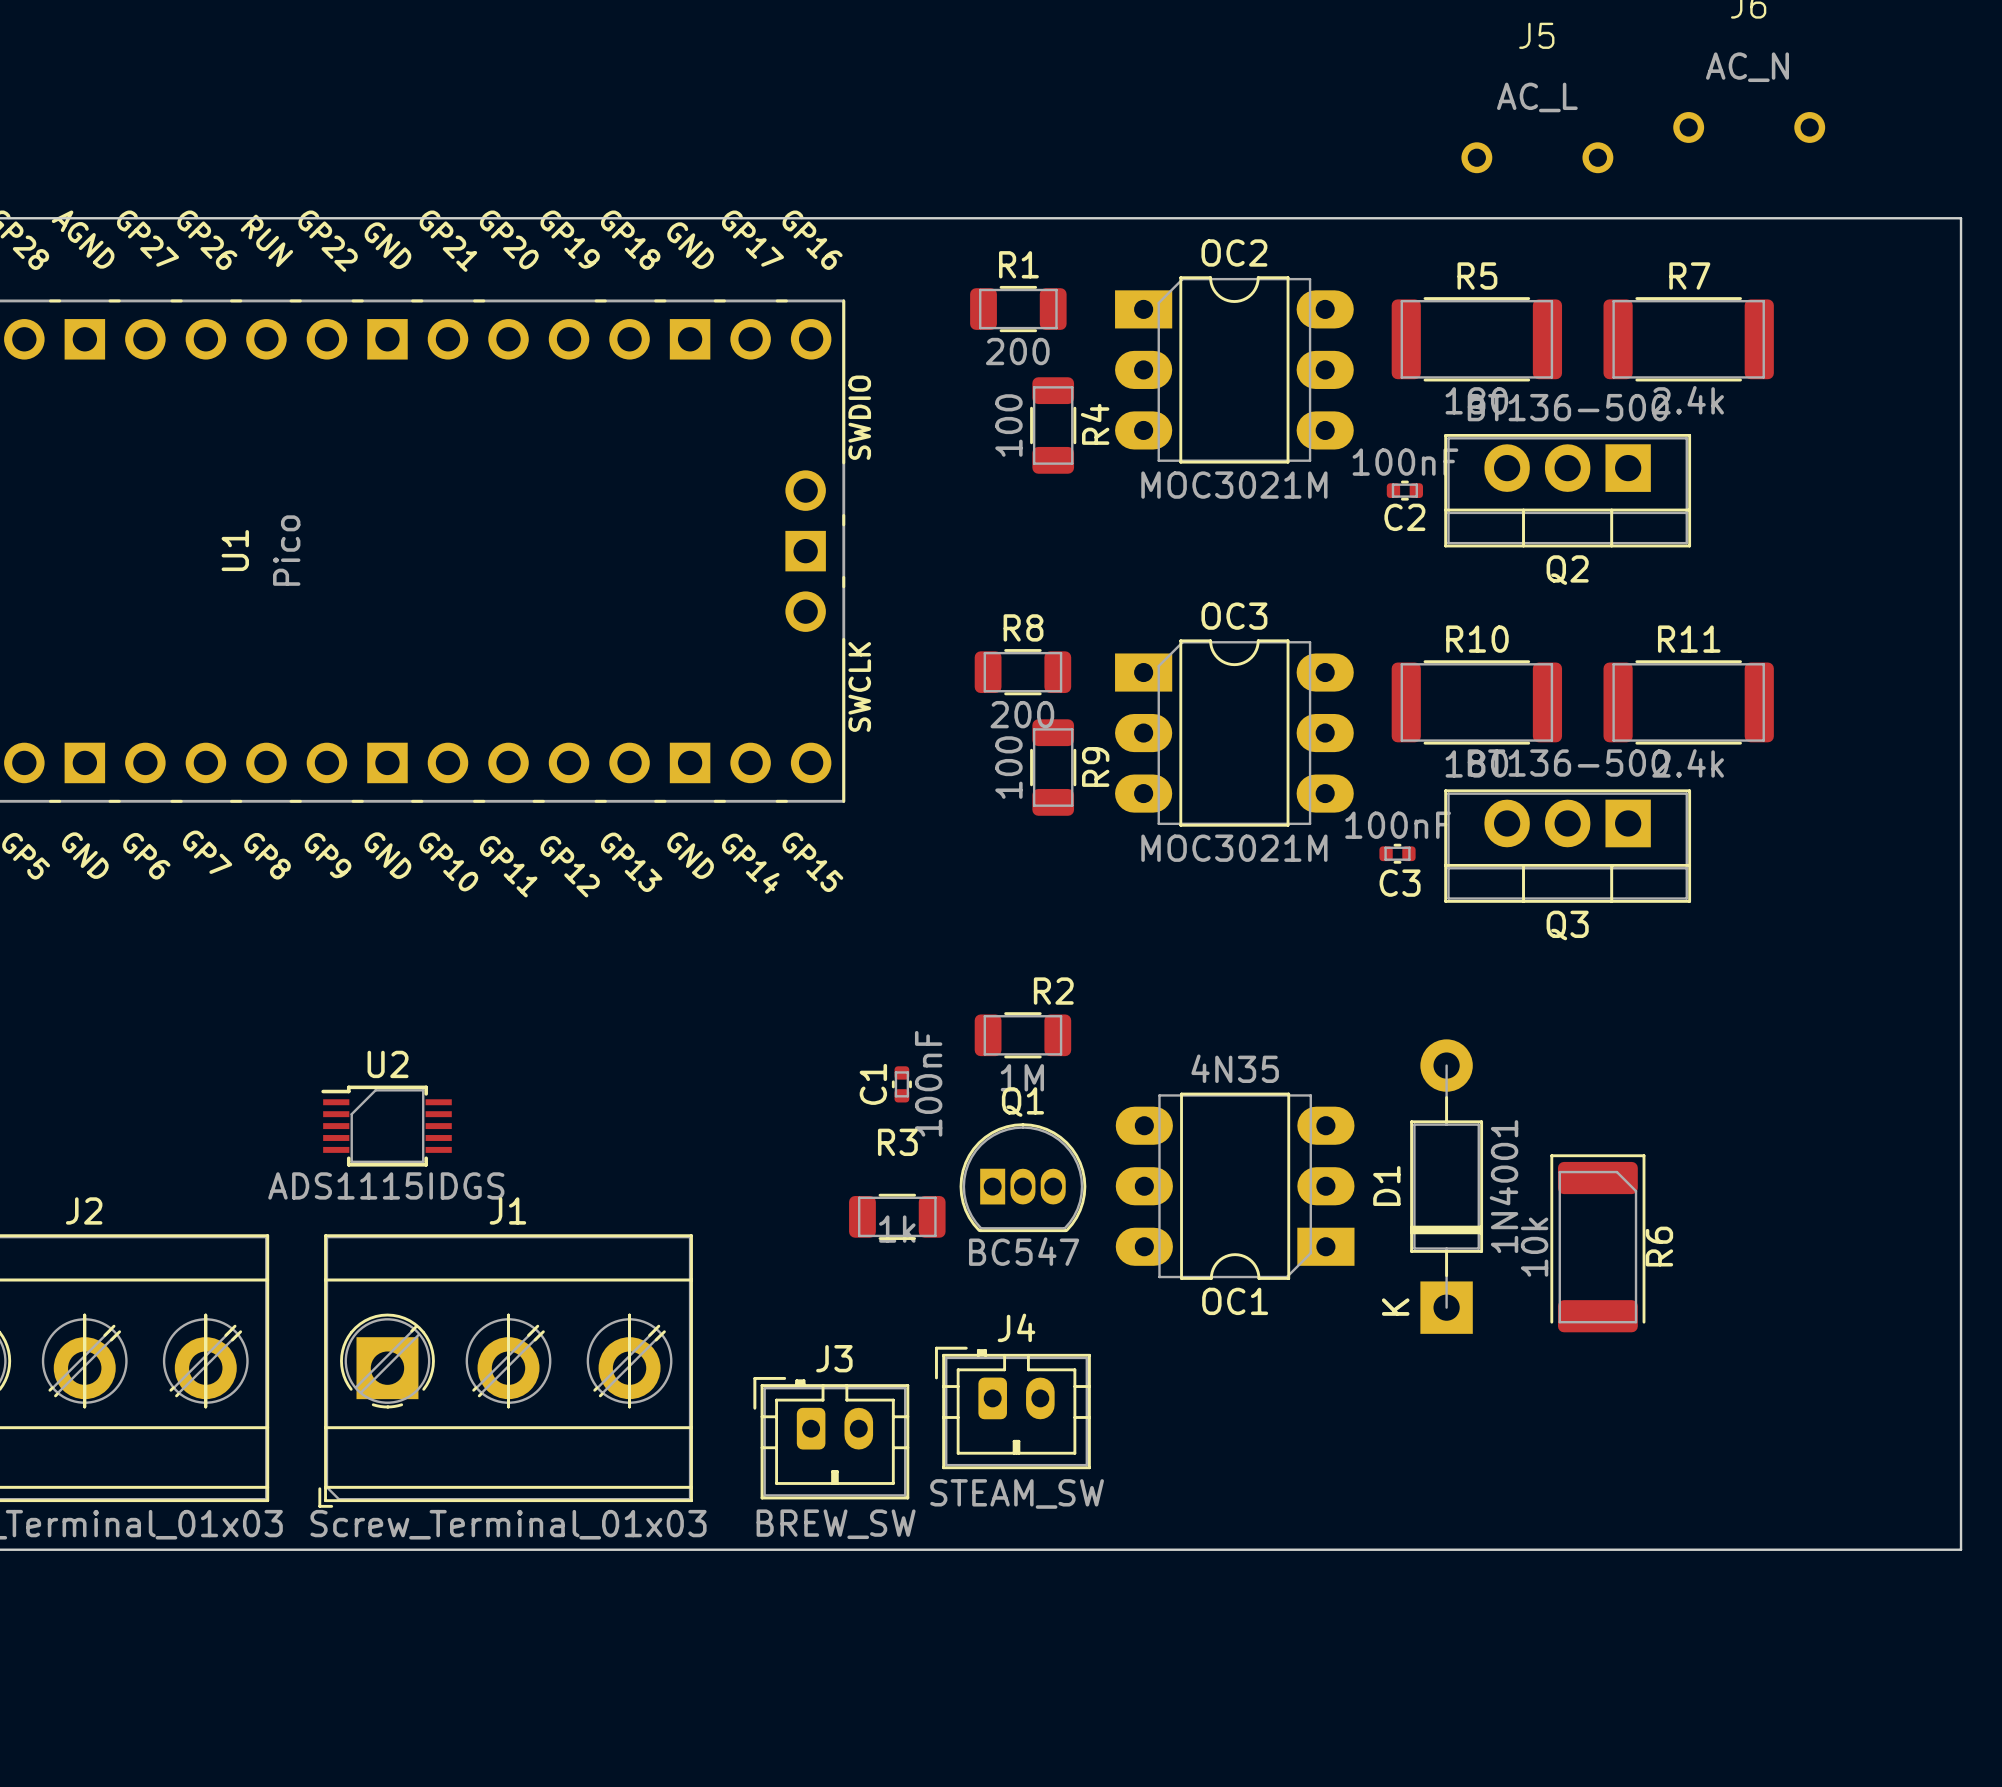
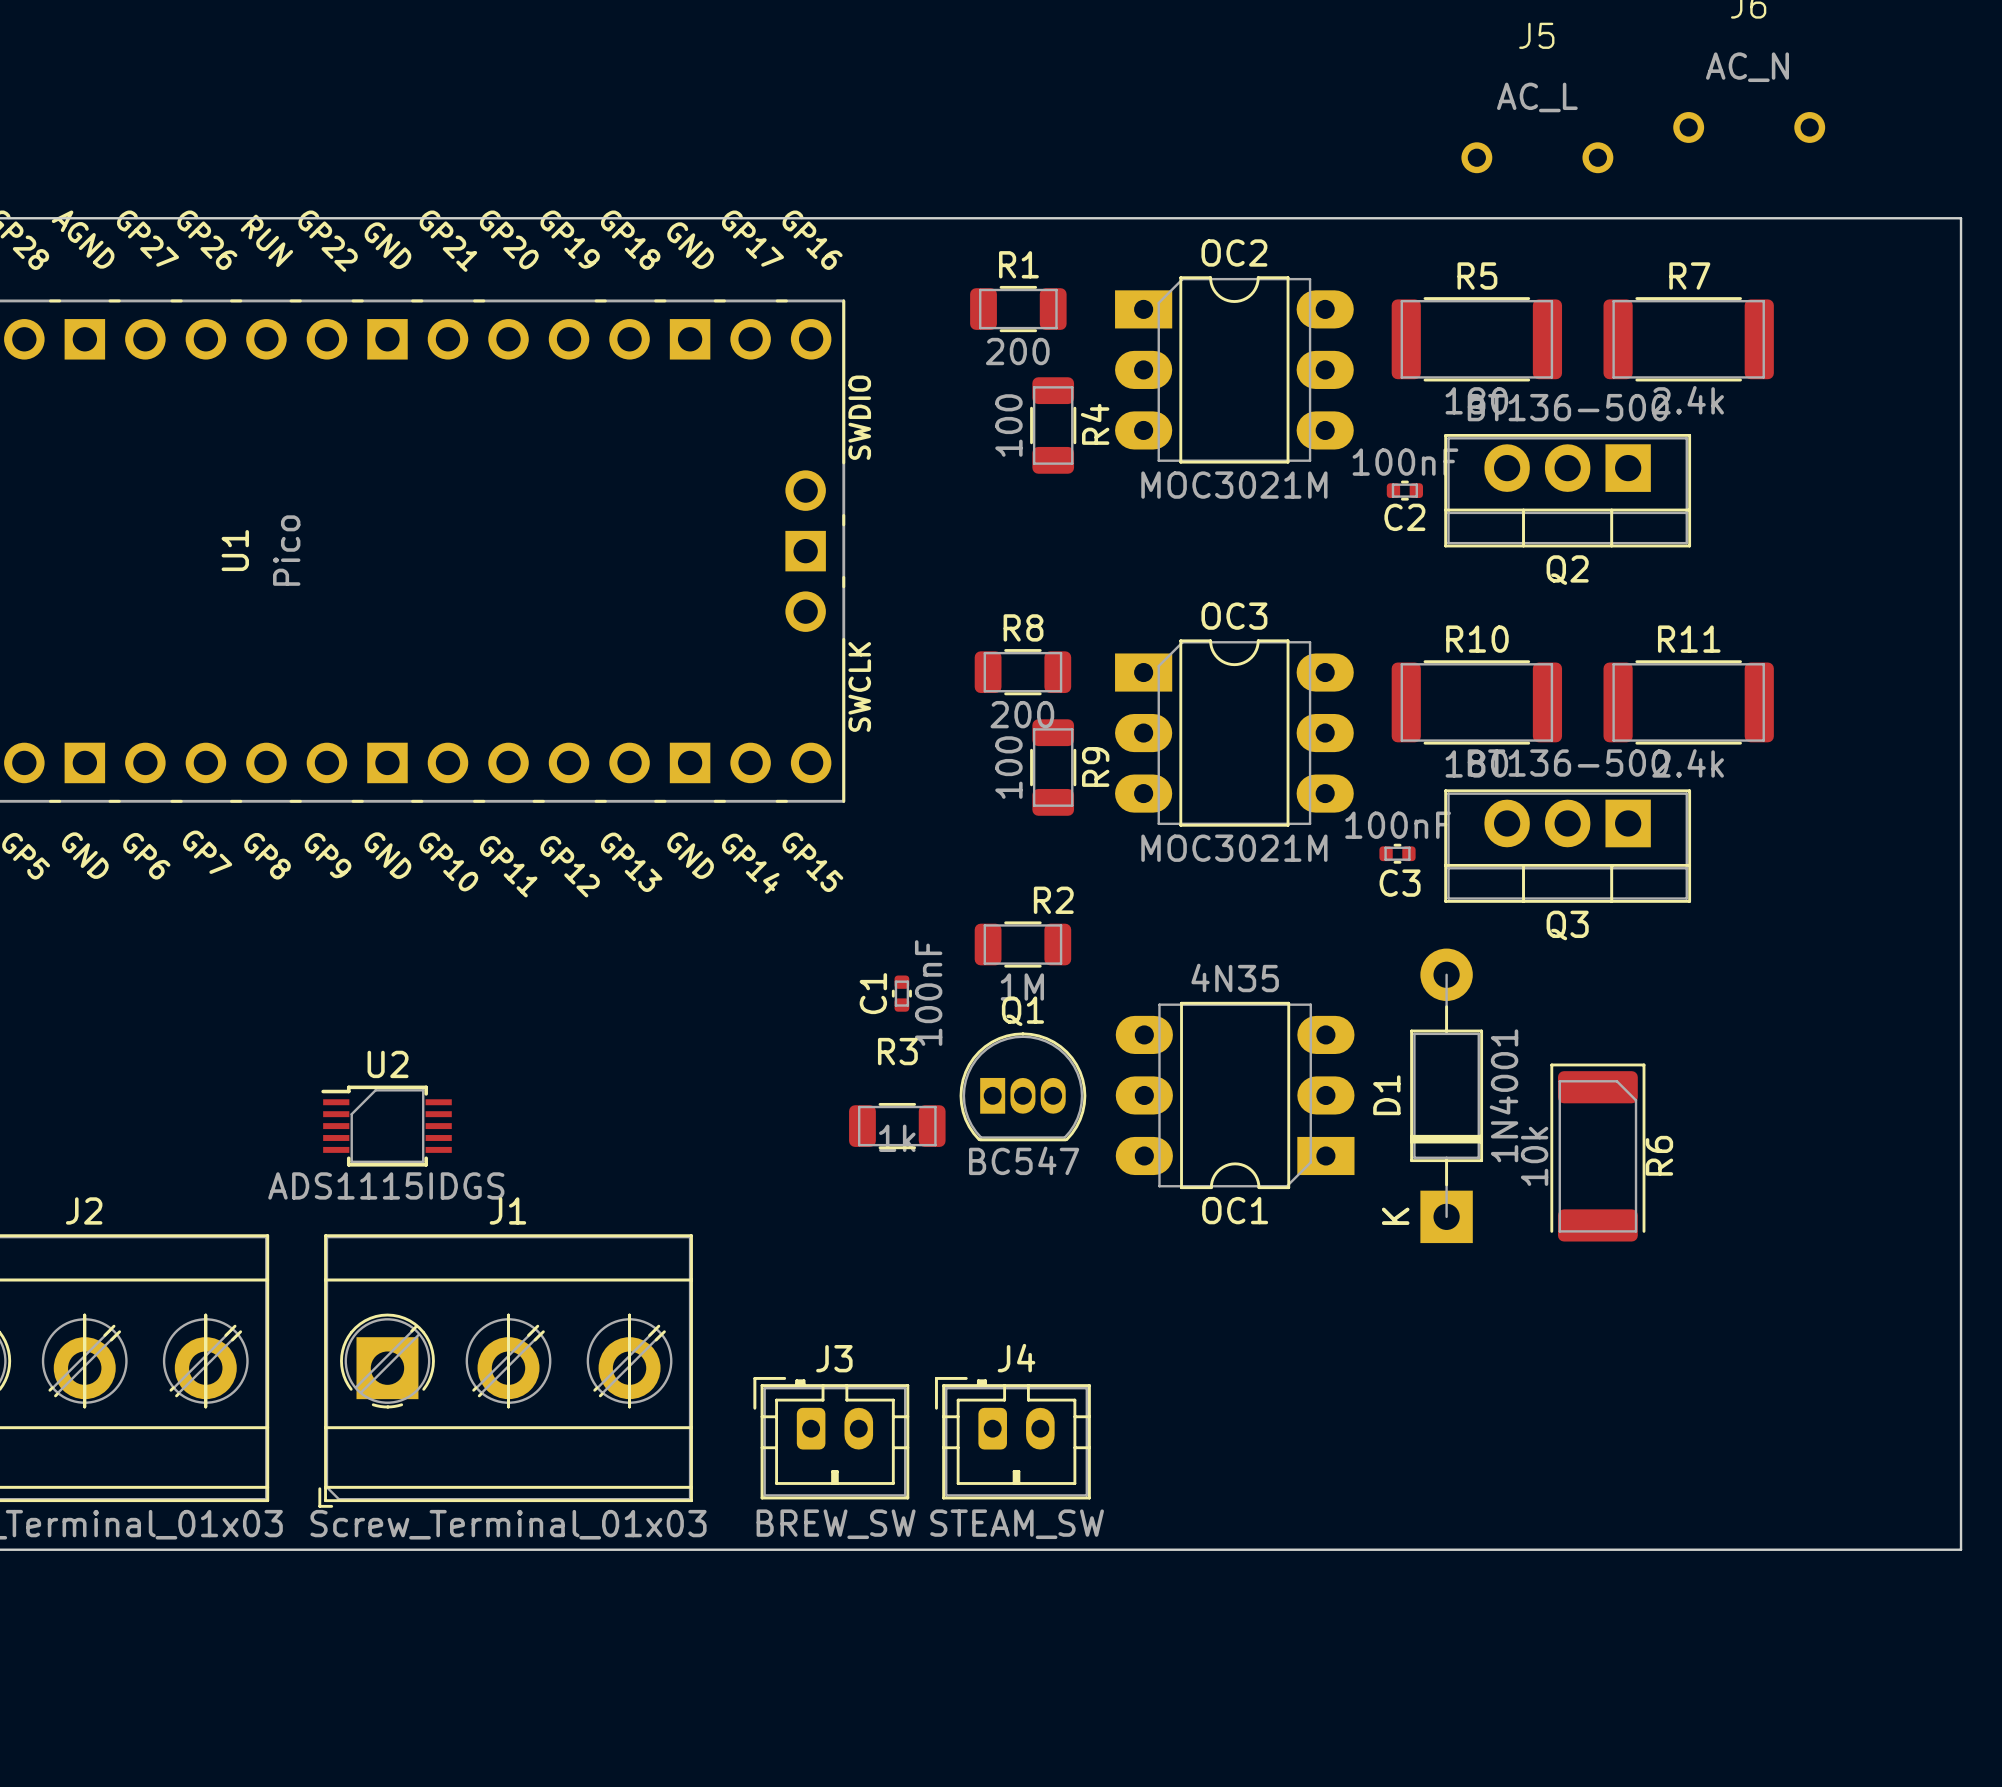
R2 position: (1022, 1035) -> (1022, 944)
C1 position: (901, 1084) -> (901, 993)
Q1 position: (1022, 1177) -> (1022, 1086)
OC1 position: (1235, 1186) -> (1235, 1095)
D1 position: (1446, 1186) -> (1446, 1095)
R3 position: (897, 1216) -> (897, 1126)
R6 position: (1597, 1243) -> (1597, 1152)
J4 position: (1012, 1407) -> (1012, 1438)

